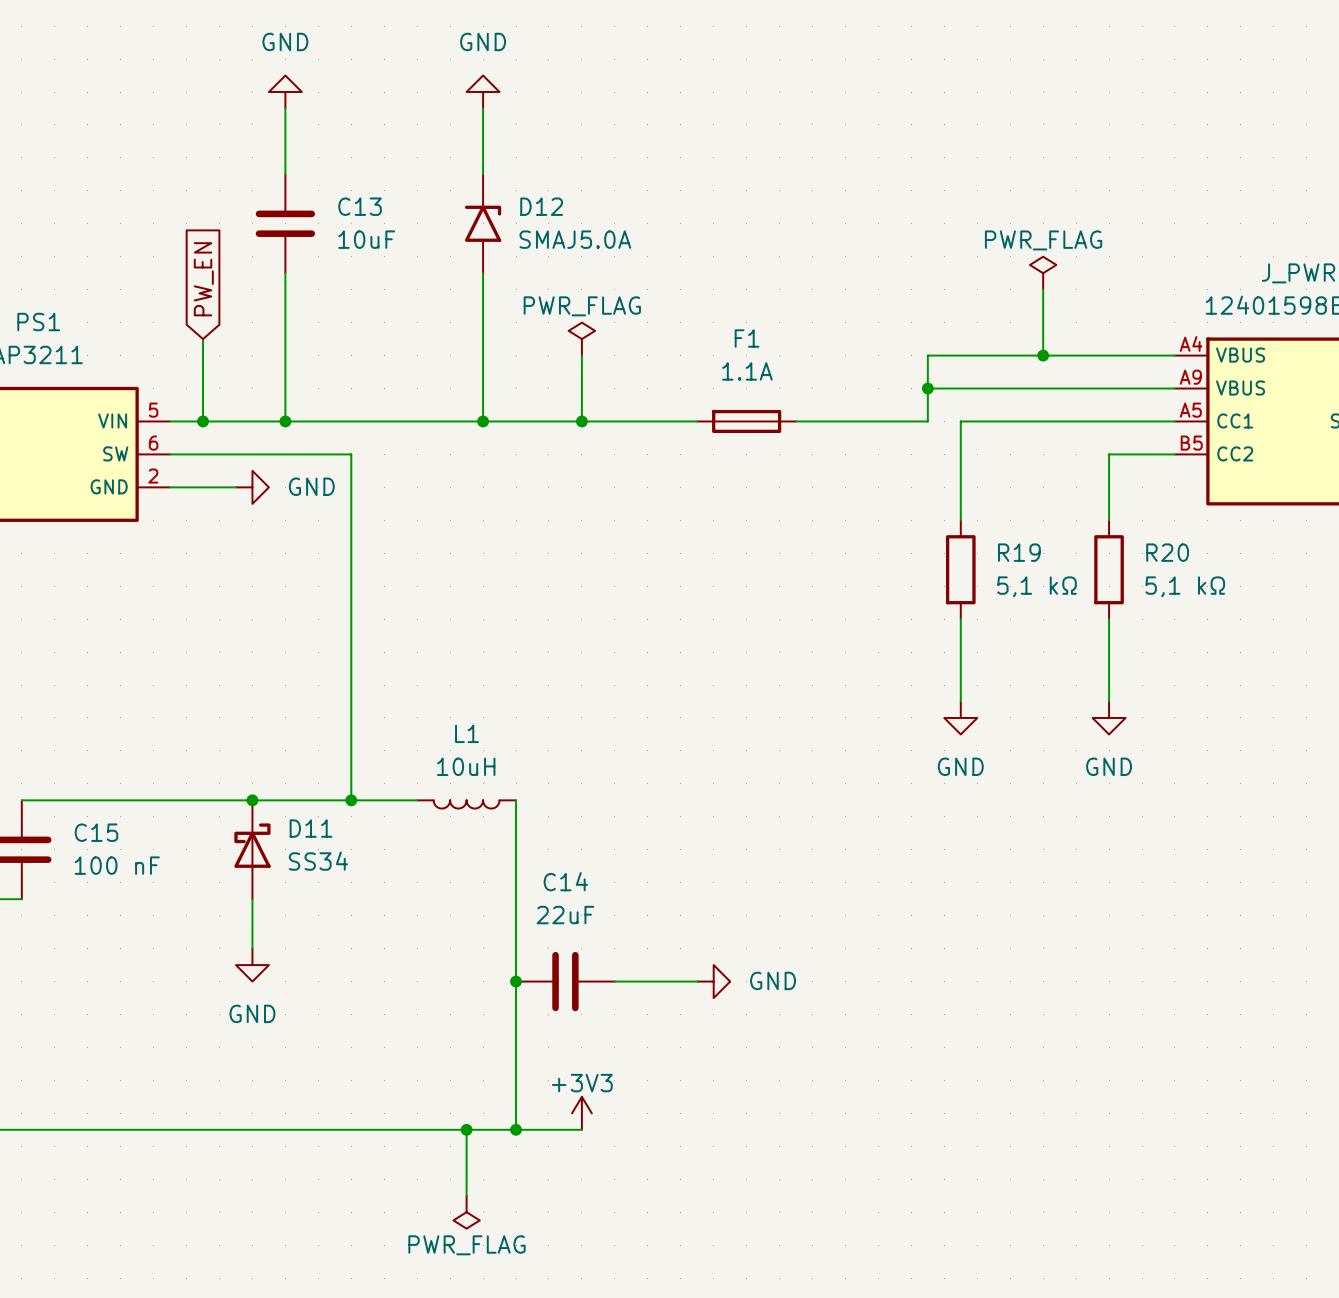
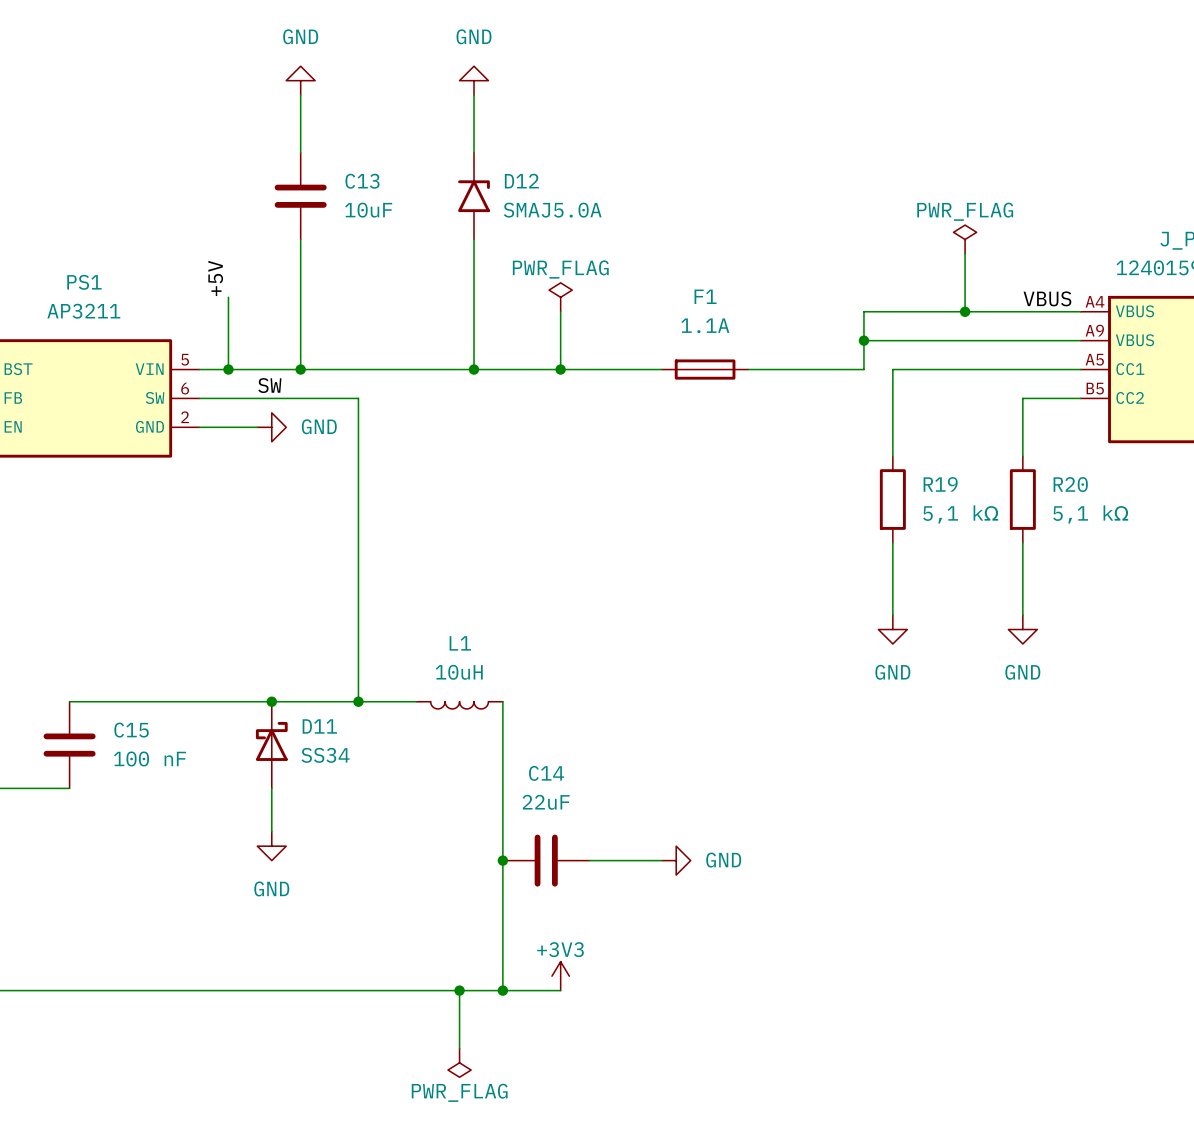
global label: PW_EN (203, 279) -> none
label: none -> +5V (215, 278)
label: none -> VBUS (1047, 298)
label: none -> SW (269, 385)

